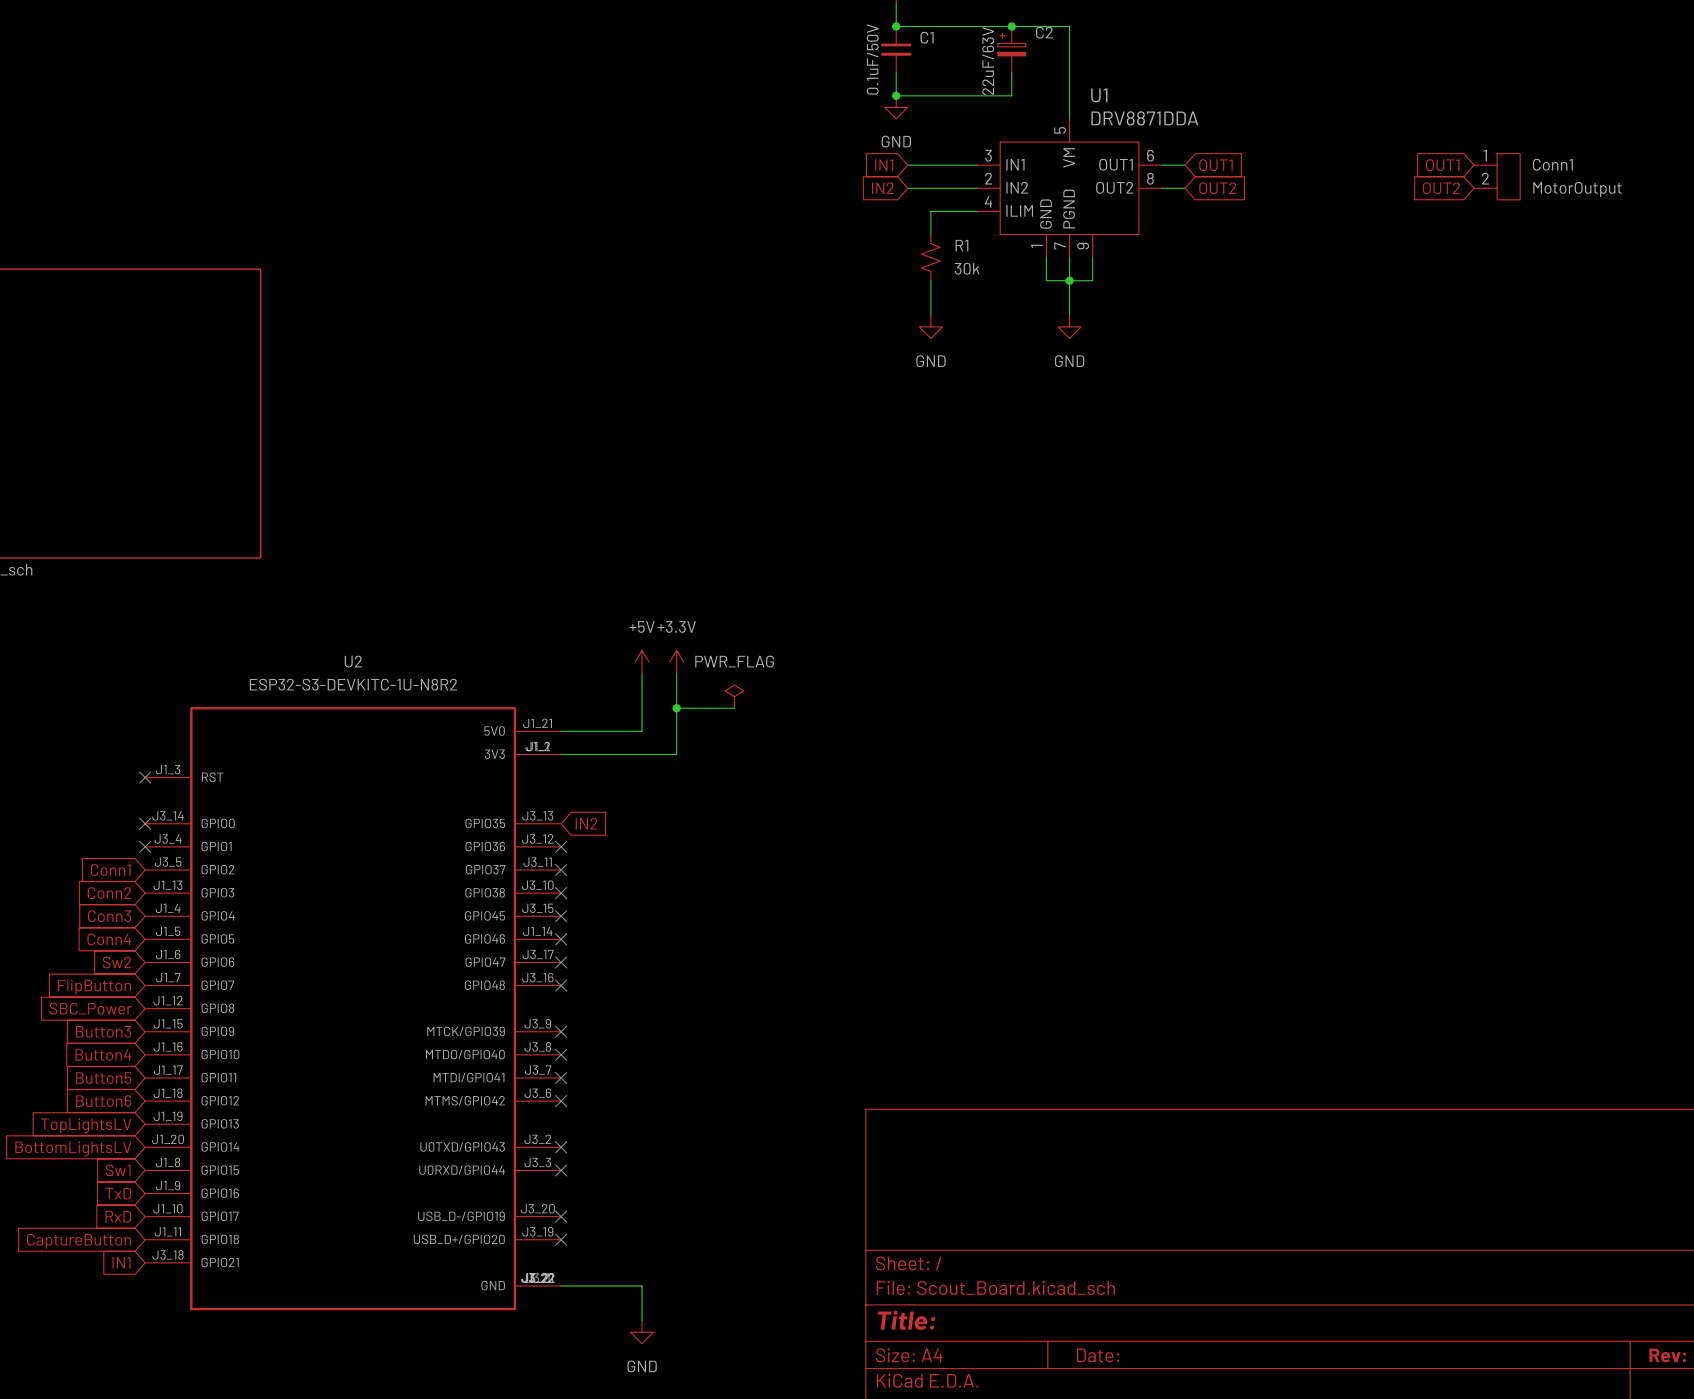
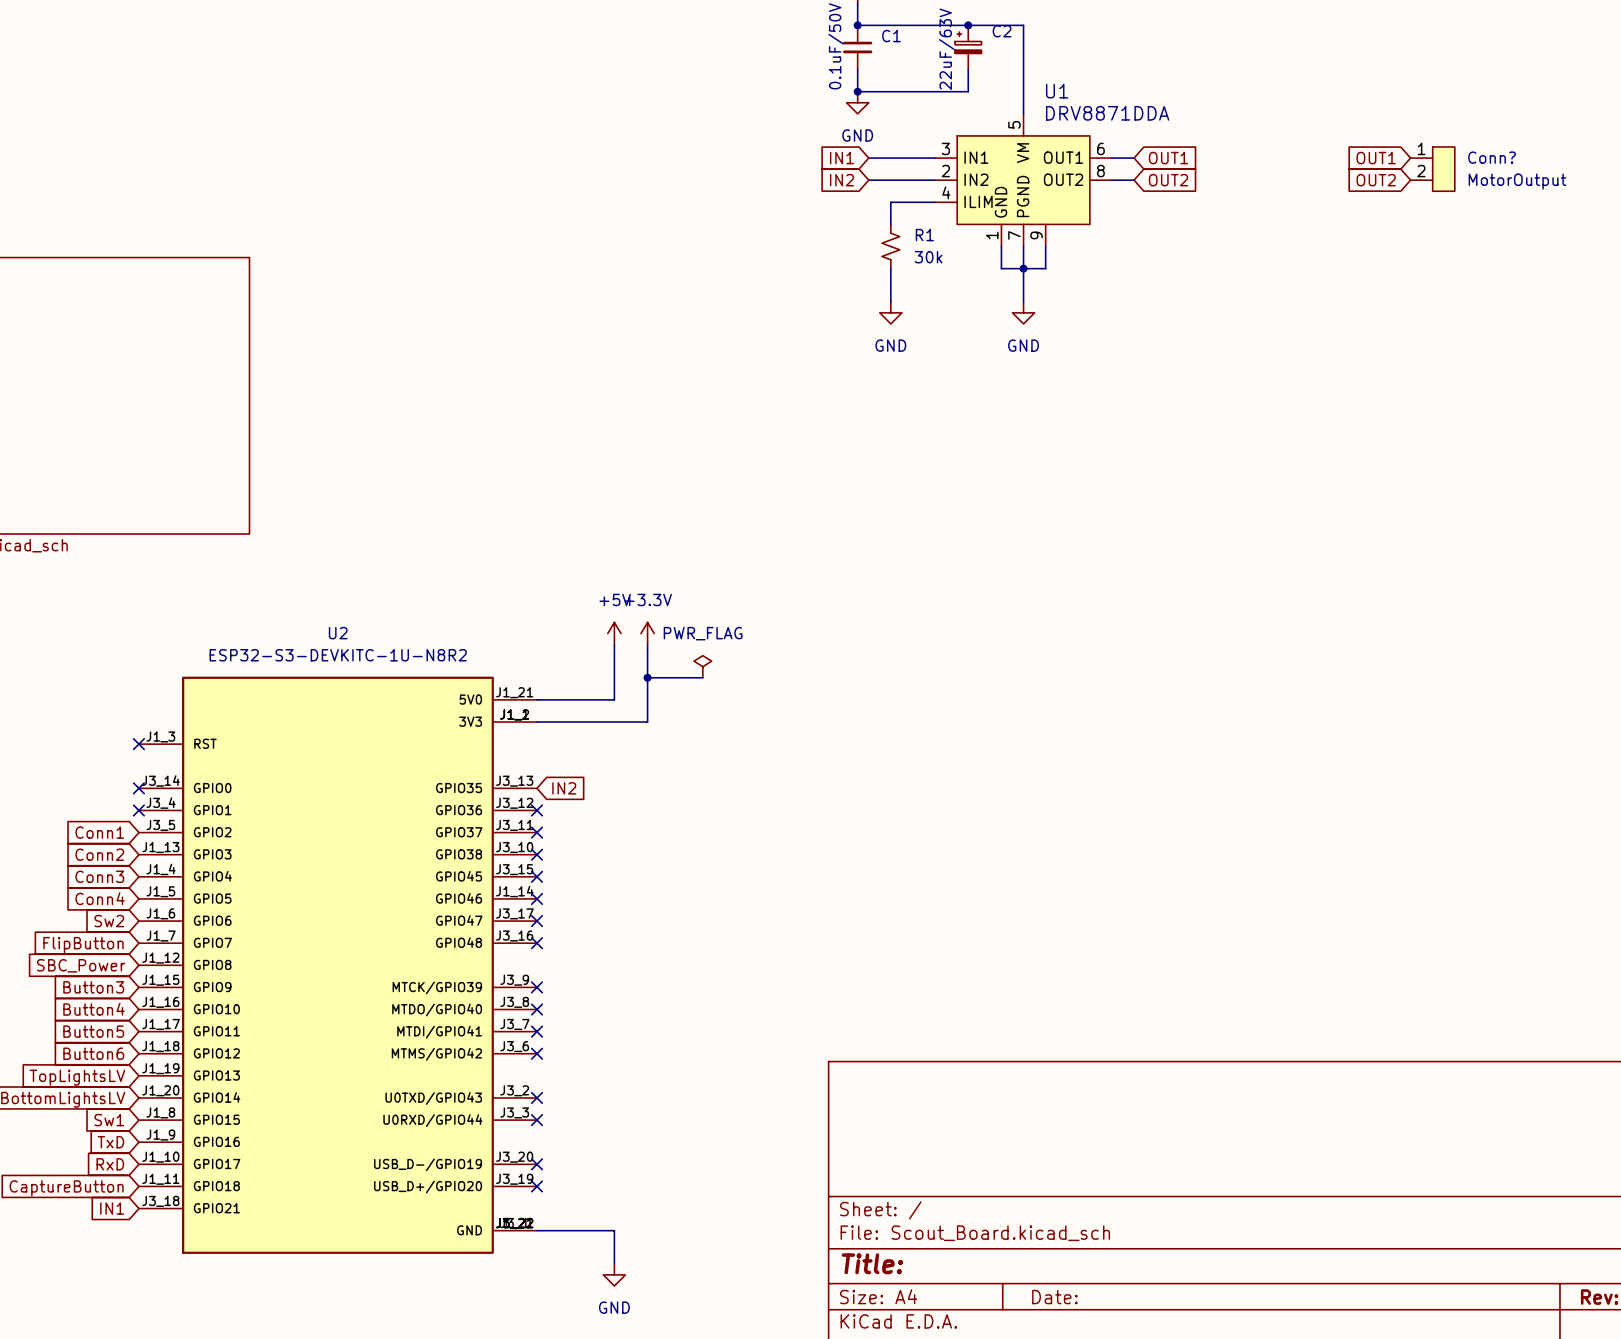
Conn1 name: Conn1 (1552, 164) -> Conn? (1492, 157)

